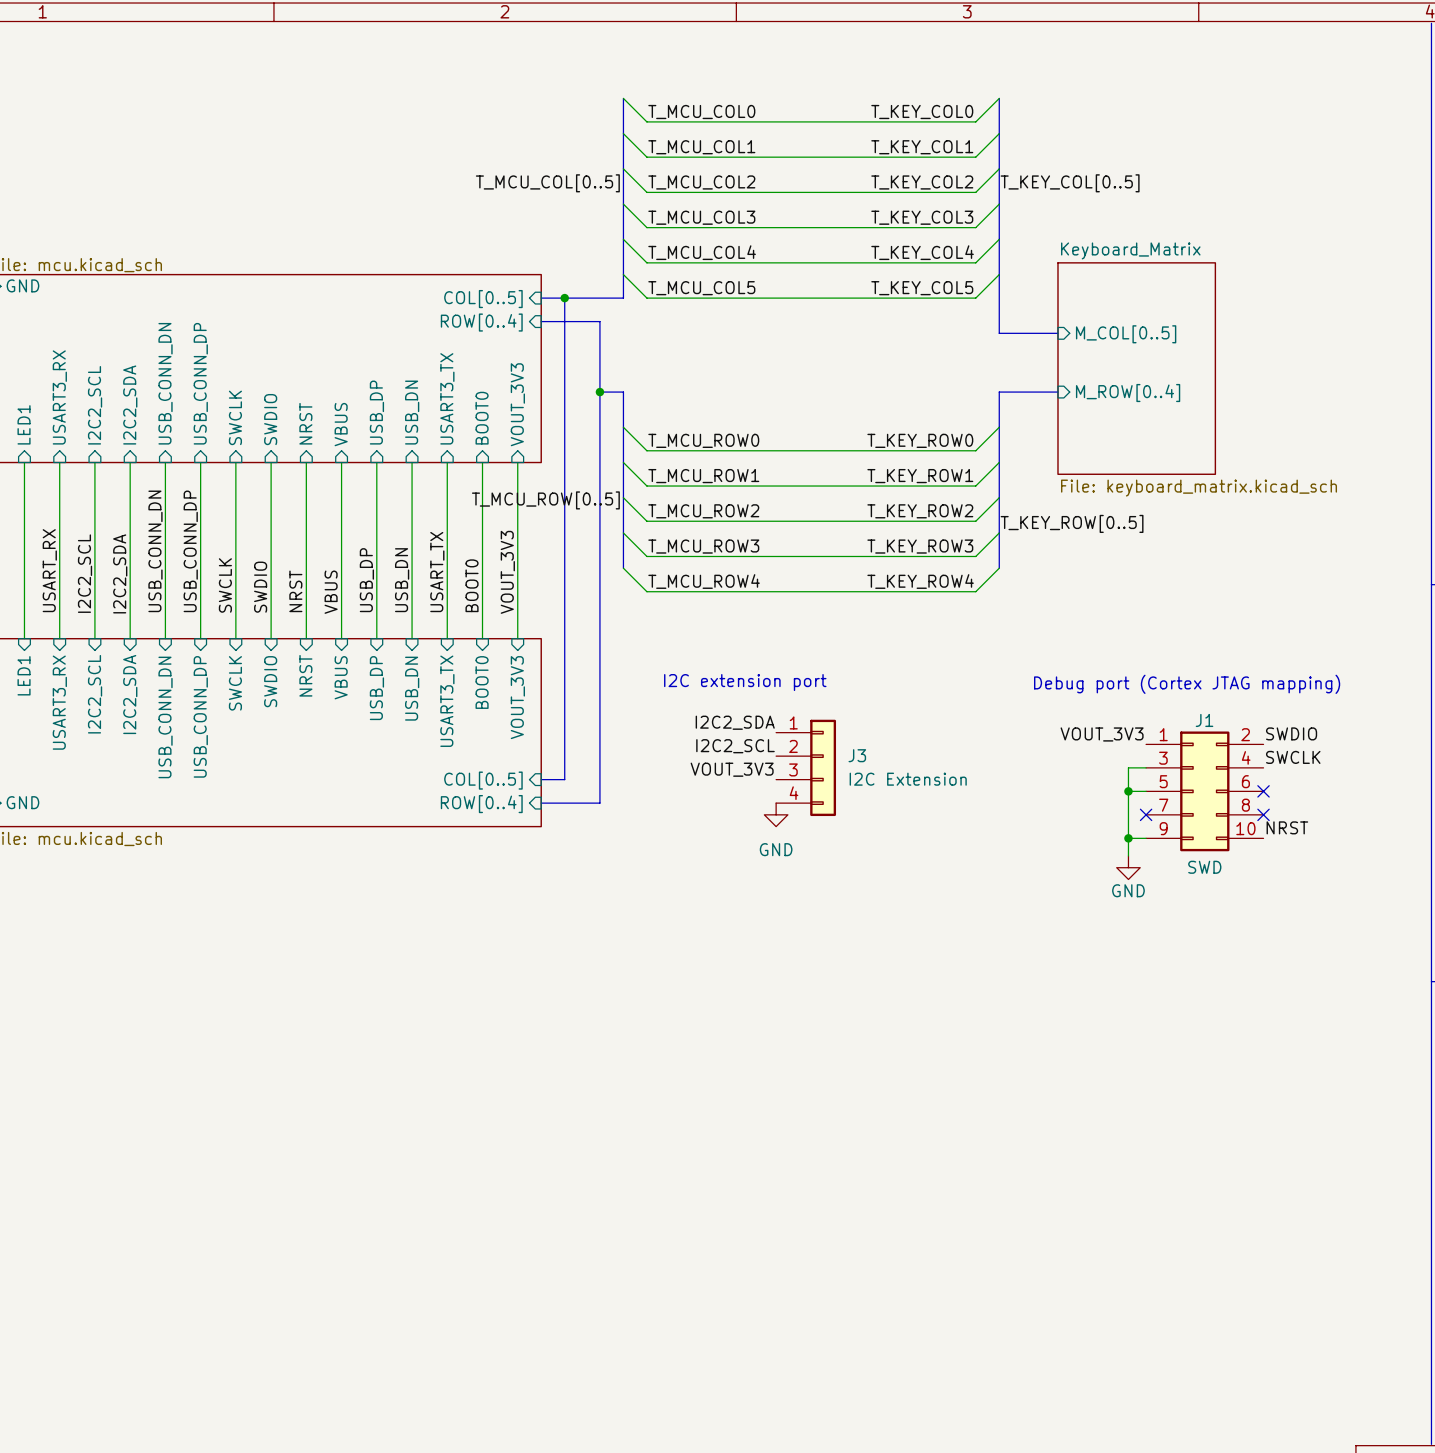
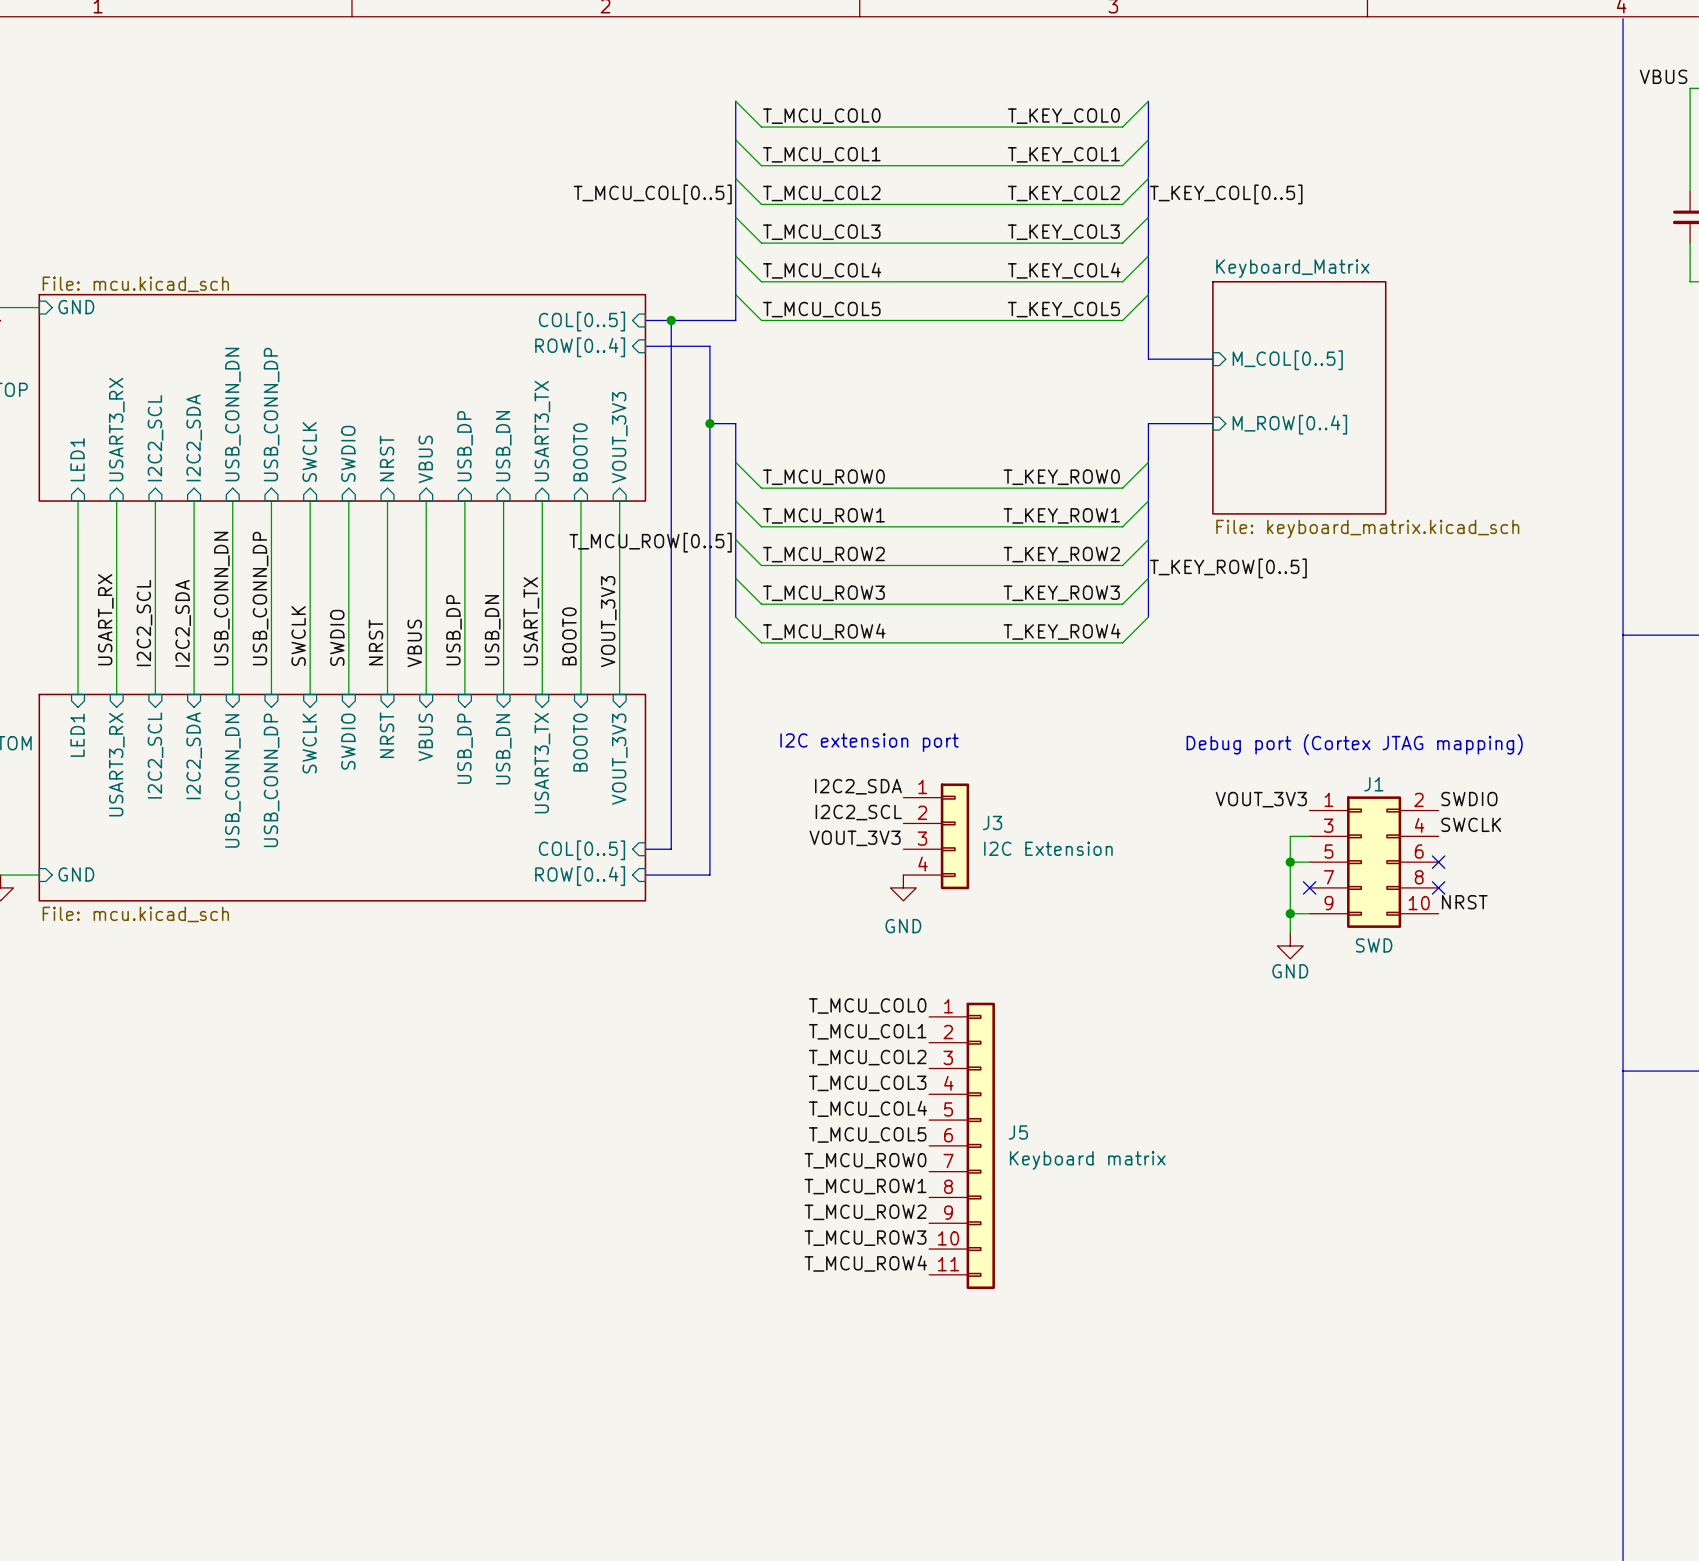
label: none -> T_MCU_COL0 (867, 1006)
label: none -> T_MCU_COL1 (867, 1031)
label: none -> T_MCU_COL2 (867, 1057)
label: none -> T_MCU_COL3 (867, 1083)
label: none -> T_MCU_COL4 (867, 1108)
label: none -> T_MCU_COL5 (867, 1134)
J5: none -> Keyboard matrix (962, 1145)
label: none -> T_MCU_ROW0 (865, 1160)
label: none -> T_MCU_ROW1 (865, 1186)
label: none -> T_MCU_ROW2 (865, 1212)
label: none -> T_MCU_ROW3 (865, 1238)
label: none -> T_MCU_ROW4 (865, 1263)

